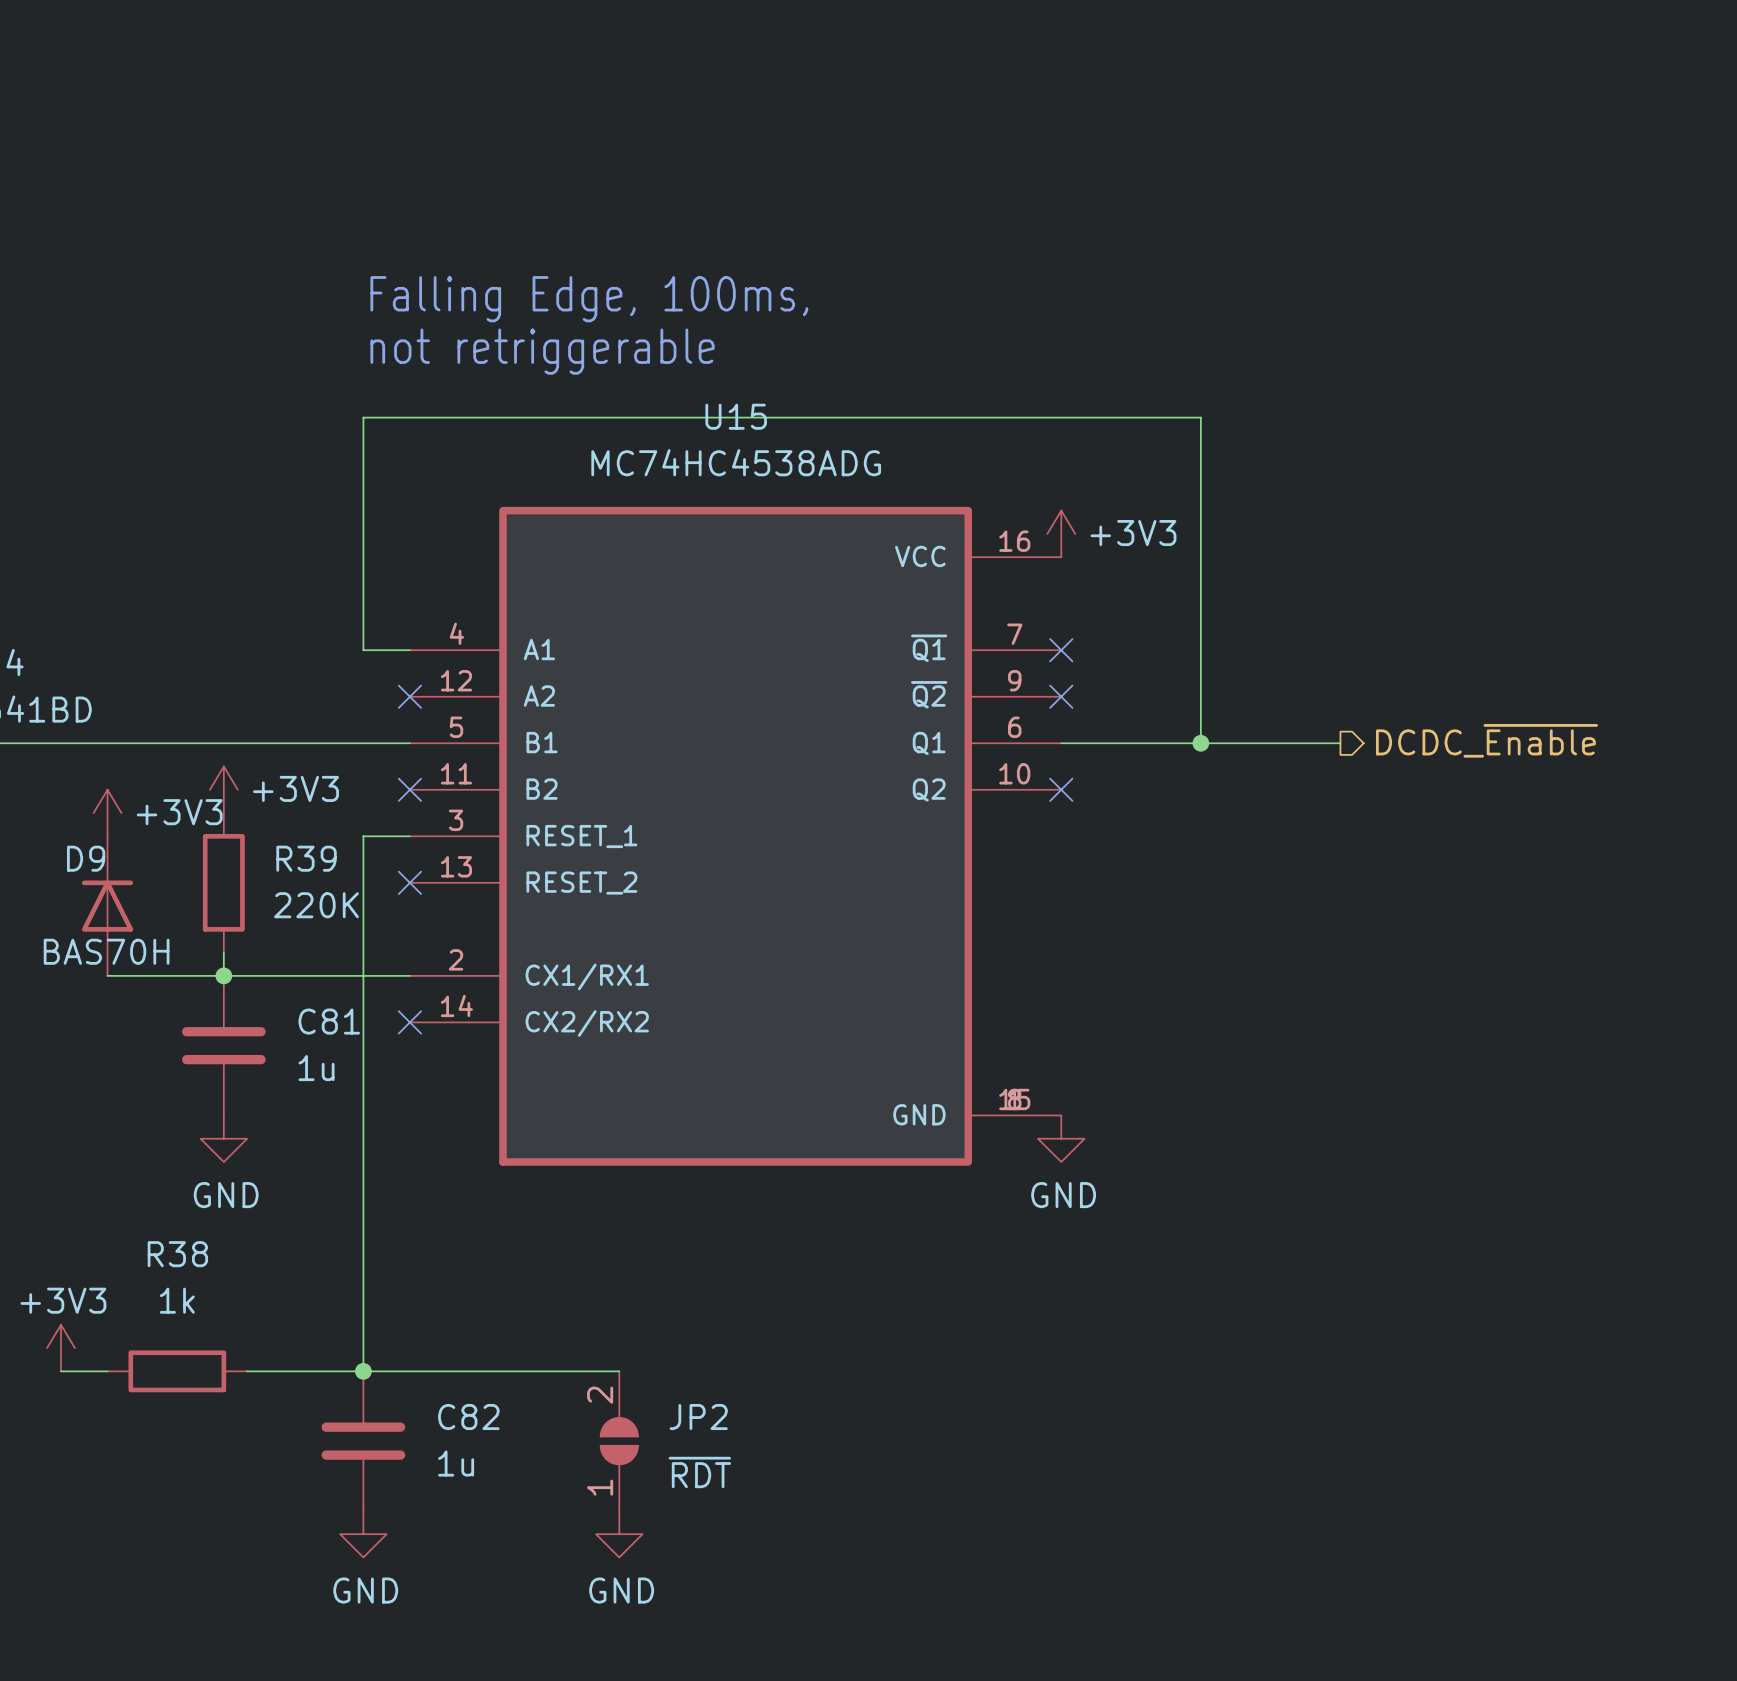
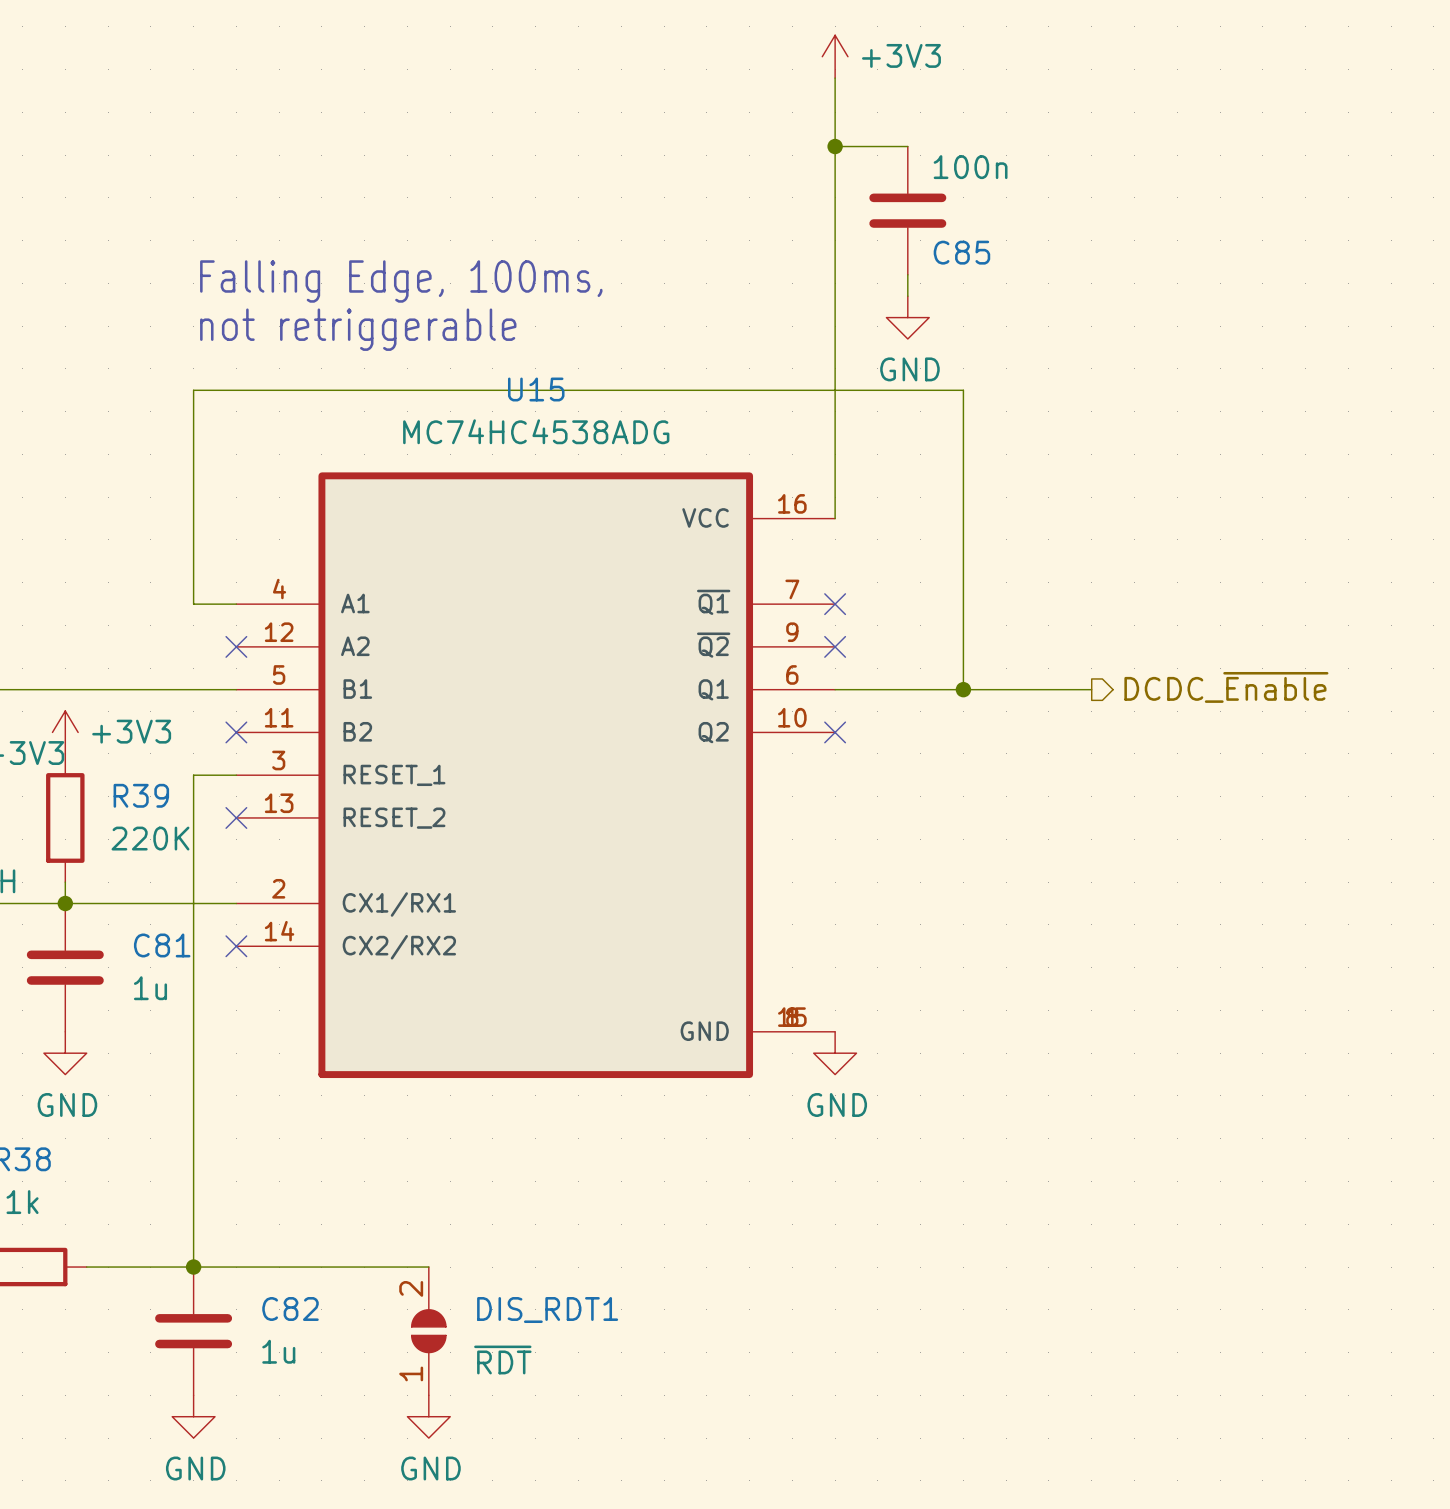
power symbol: none -> +3V3 (835, 56)
wire: none -> (835, 78) (835, 518)
wire: none -> (835, 146) (907, 146)
junction: none -> (835, 146)
C85: none -> 100n (907, 210)
wire: none -> (907, 274) (907, 296)
power symbol: none -> GND (907, 317)
power symbol: +3V3 (1061, 533) -> none
JP2 name: JP2 (698, 1417) -> DIS_RDT1 (547, 1310)

